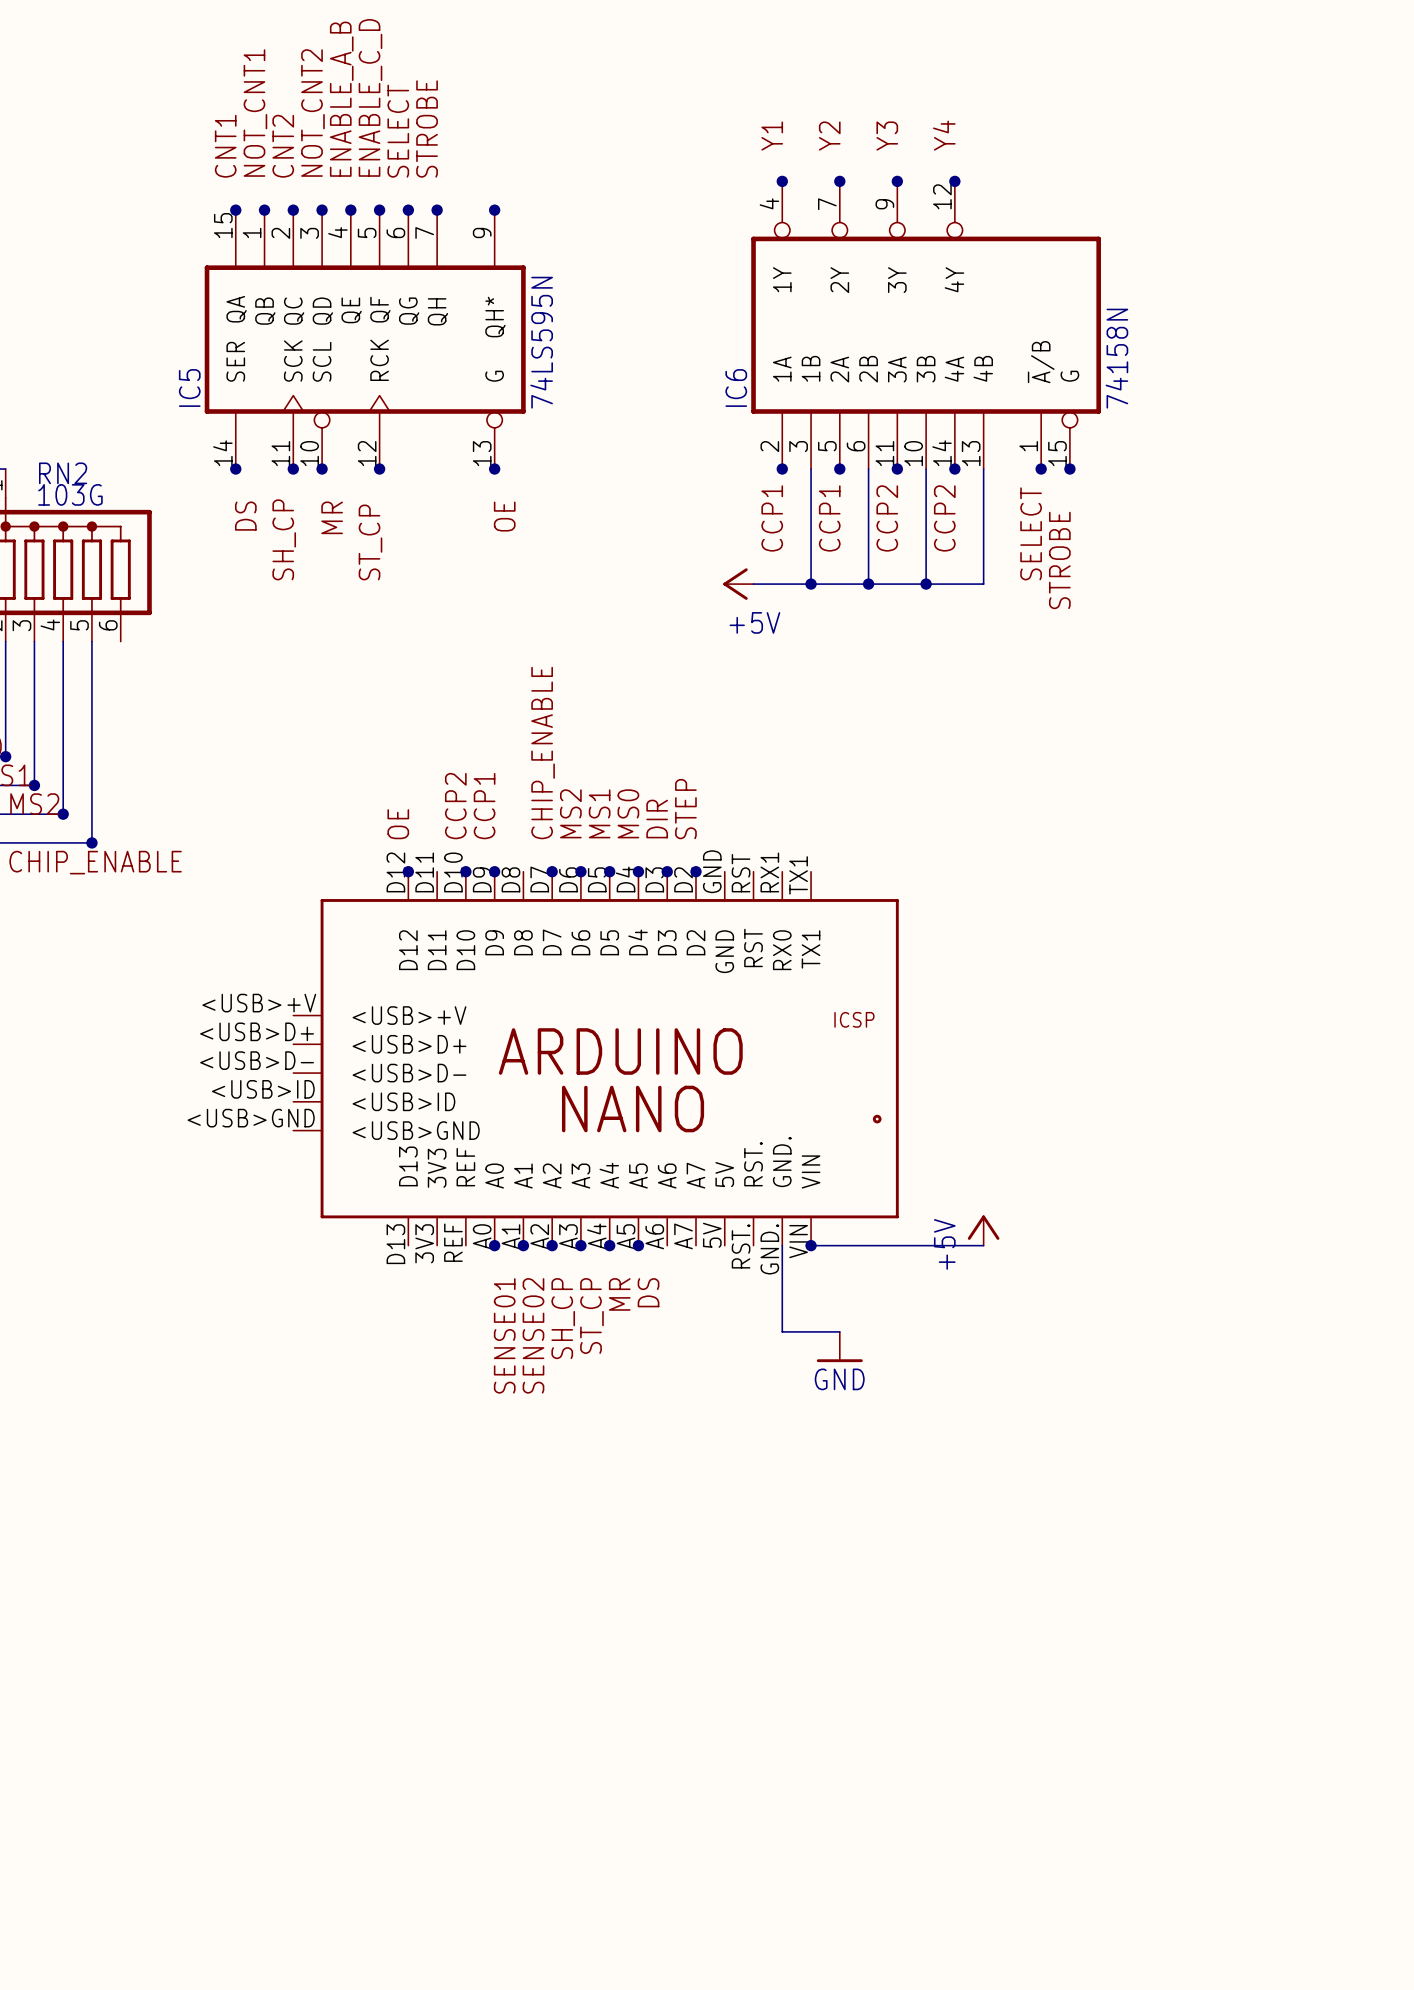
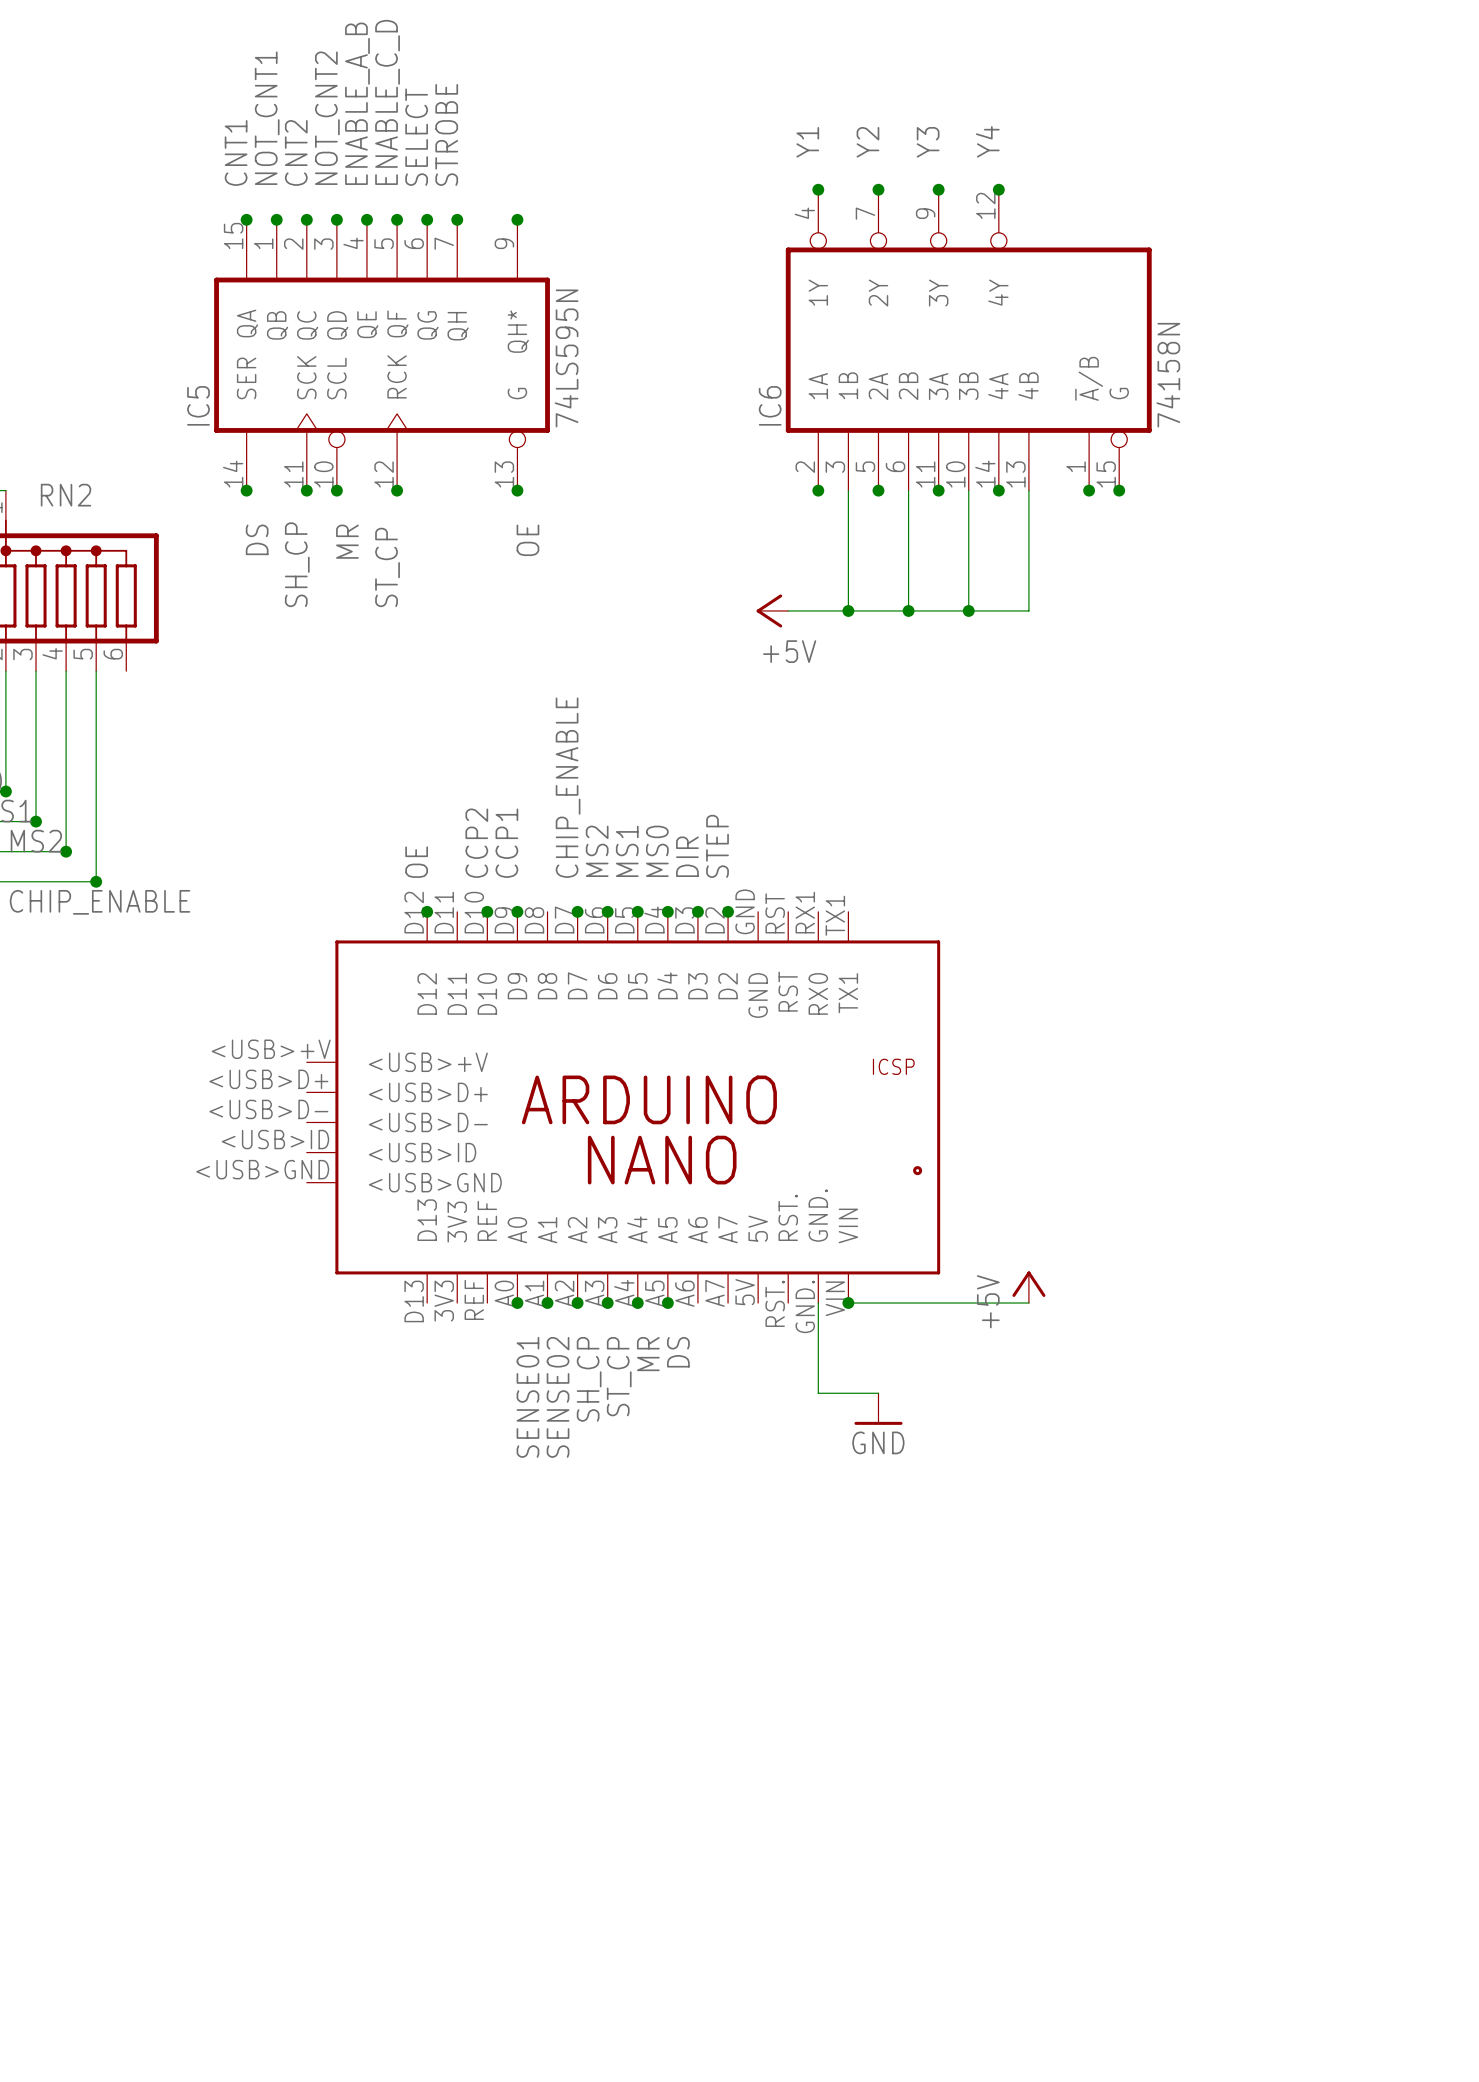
RN2 value: 103G (70, 494) -> none
label: CCP1 (772, 518) -> none
label: CCP1 (829, 518) -> none
label: CCP2 (887, 518) -> none
label: CCP2 (944, 518) -> none
label: SELECT (1031, 533) -> none
label: STROBE (1059, 560) -> none

